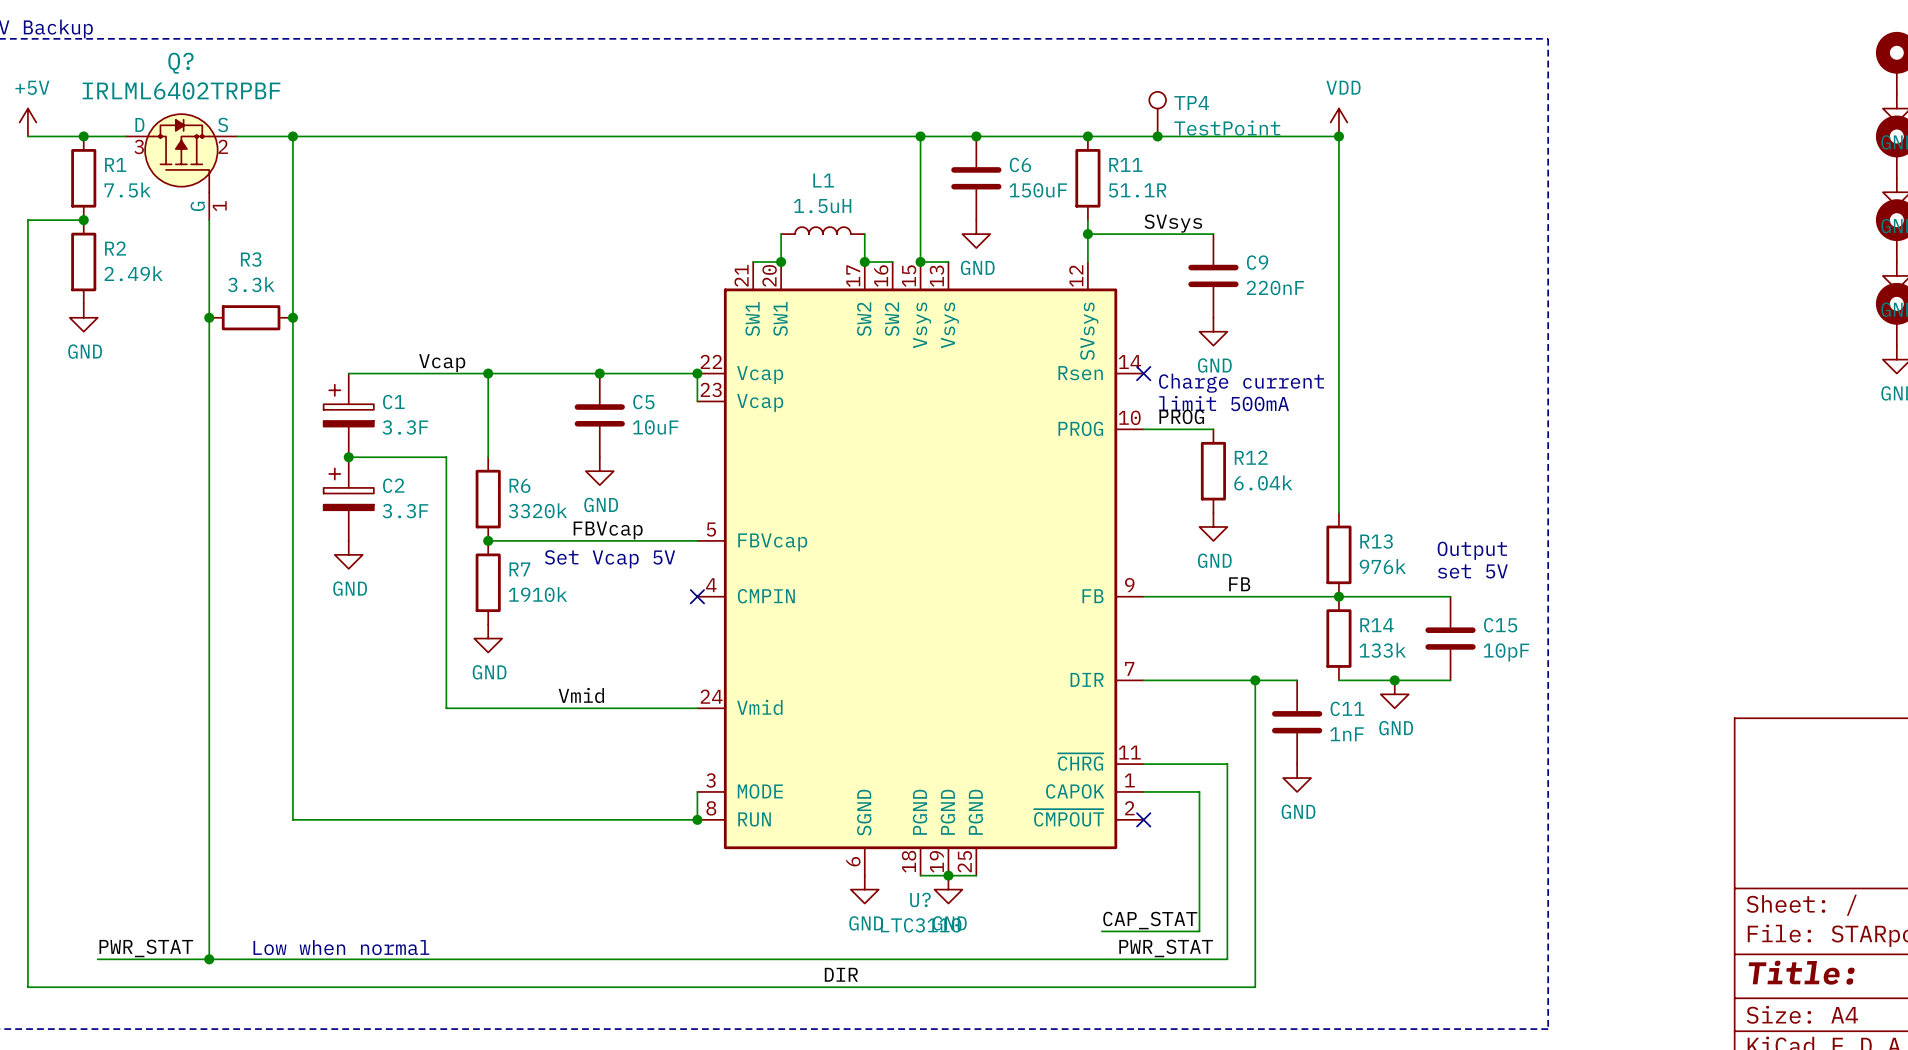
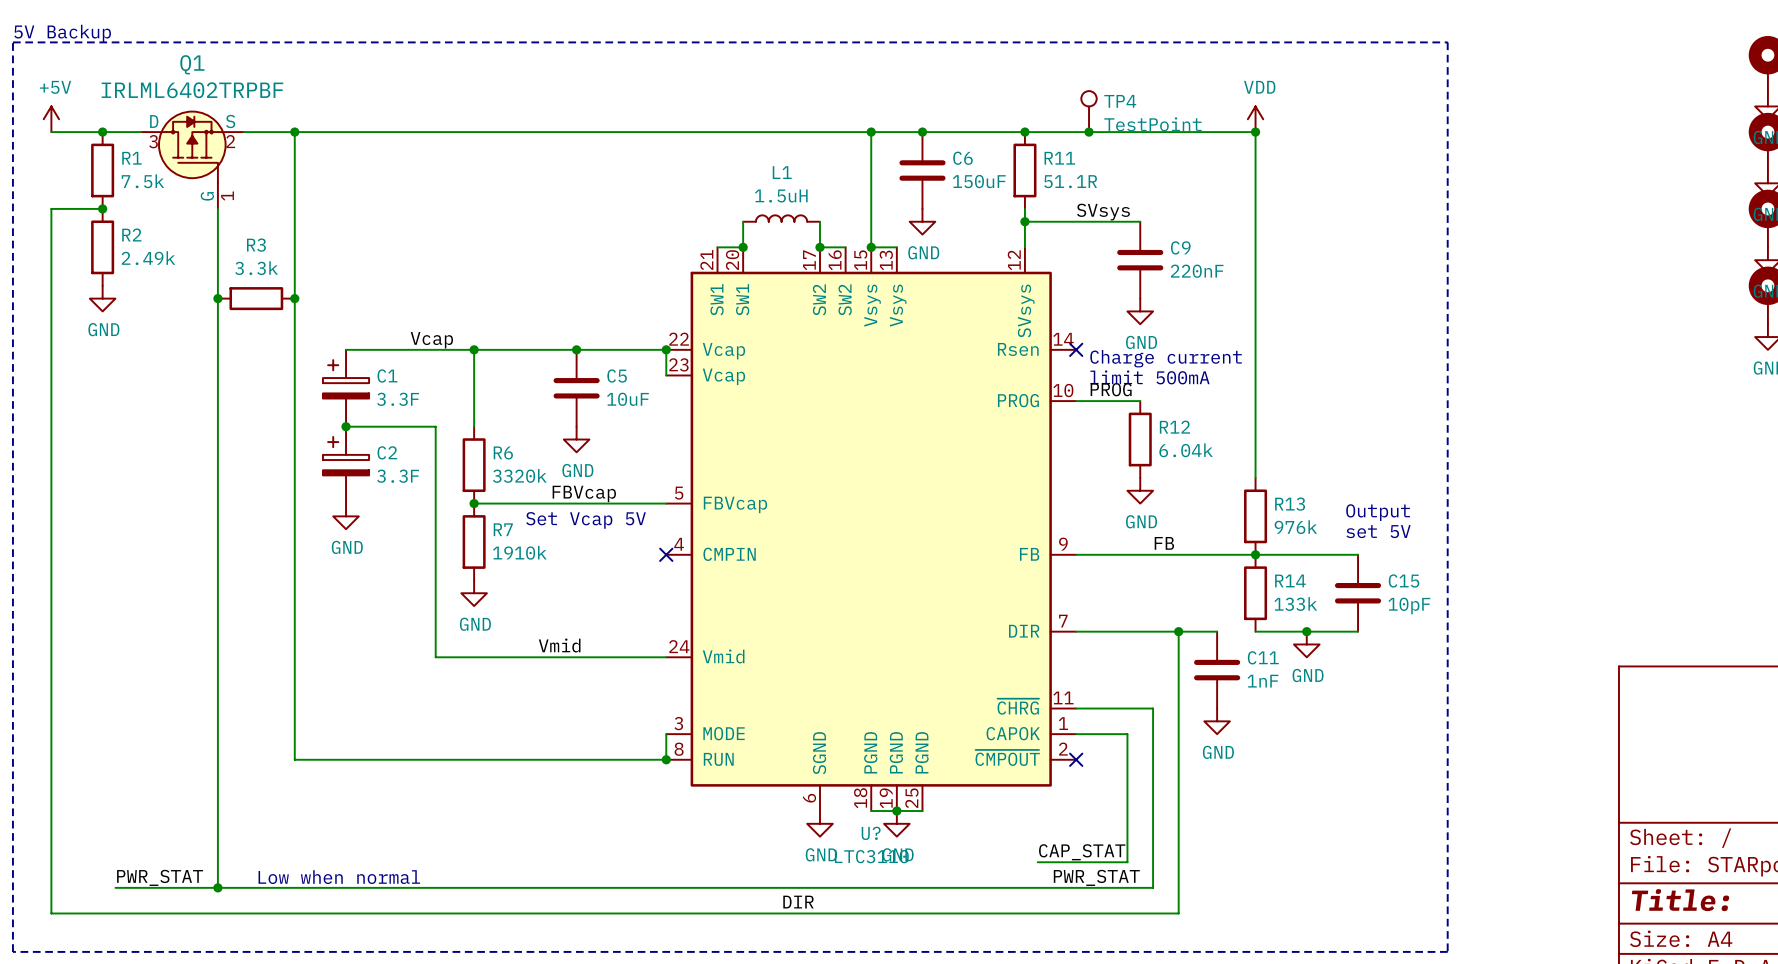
Q? name: Q? (180, 63) -> Q1 (192, 64)

